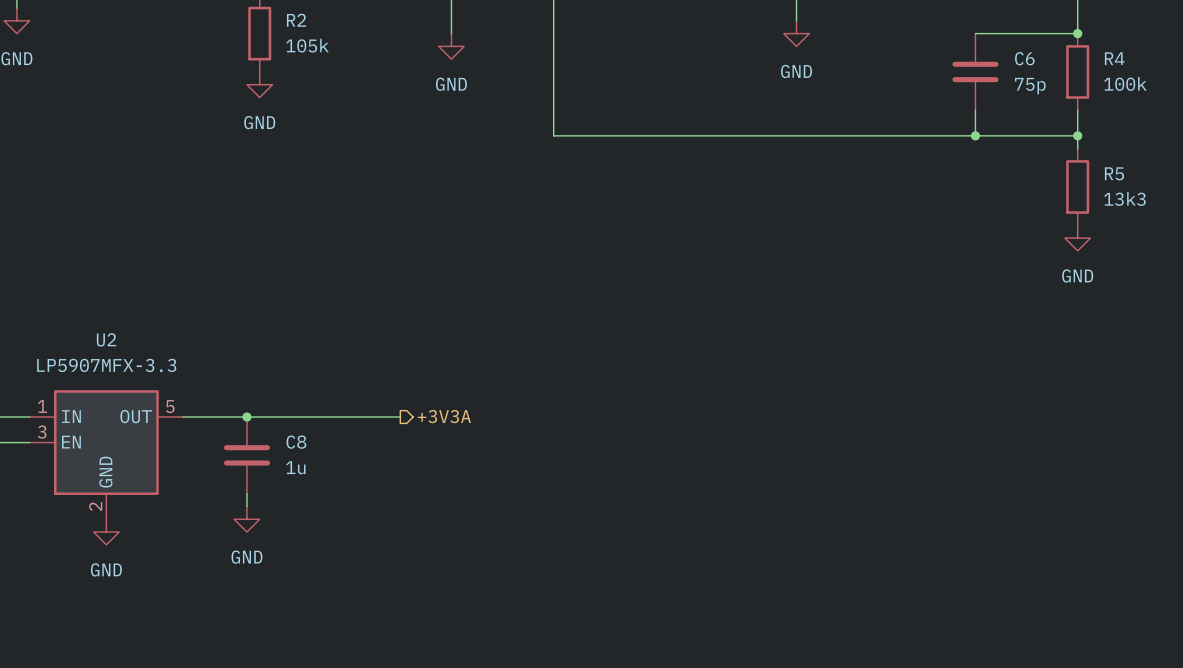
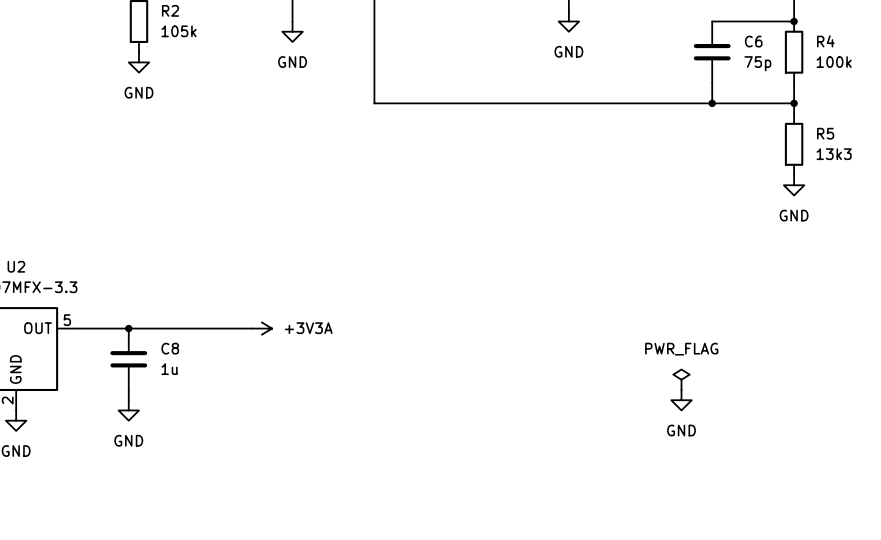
hierarchical label: +3V3A (444, 416) -> none
power symbol: none -> +3V3A (261, 328)
power symbol: none -> PWR_FLAG (681, 379)
power symbol: none -> GND (681, 400)

